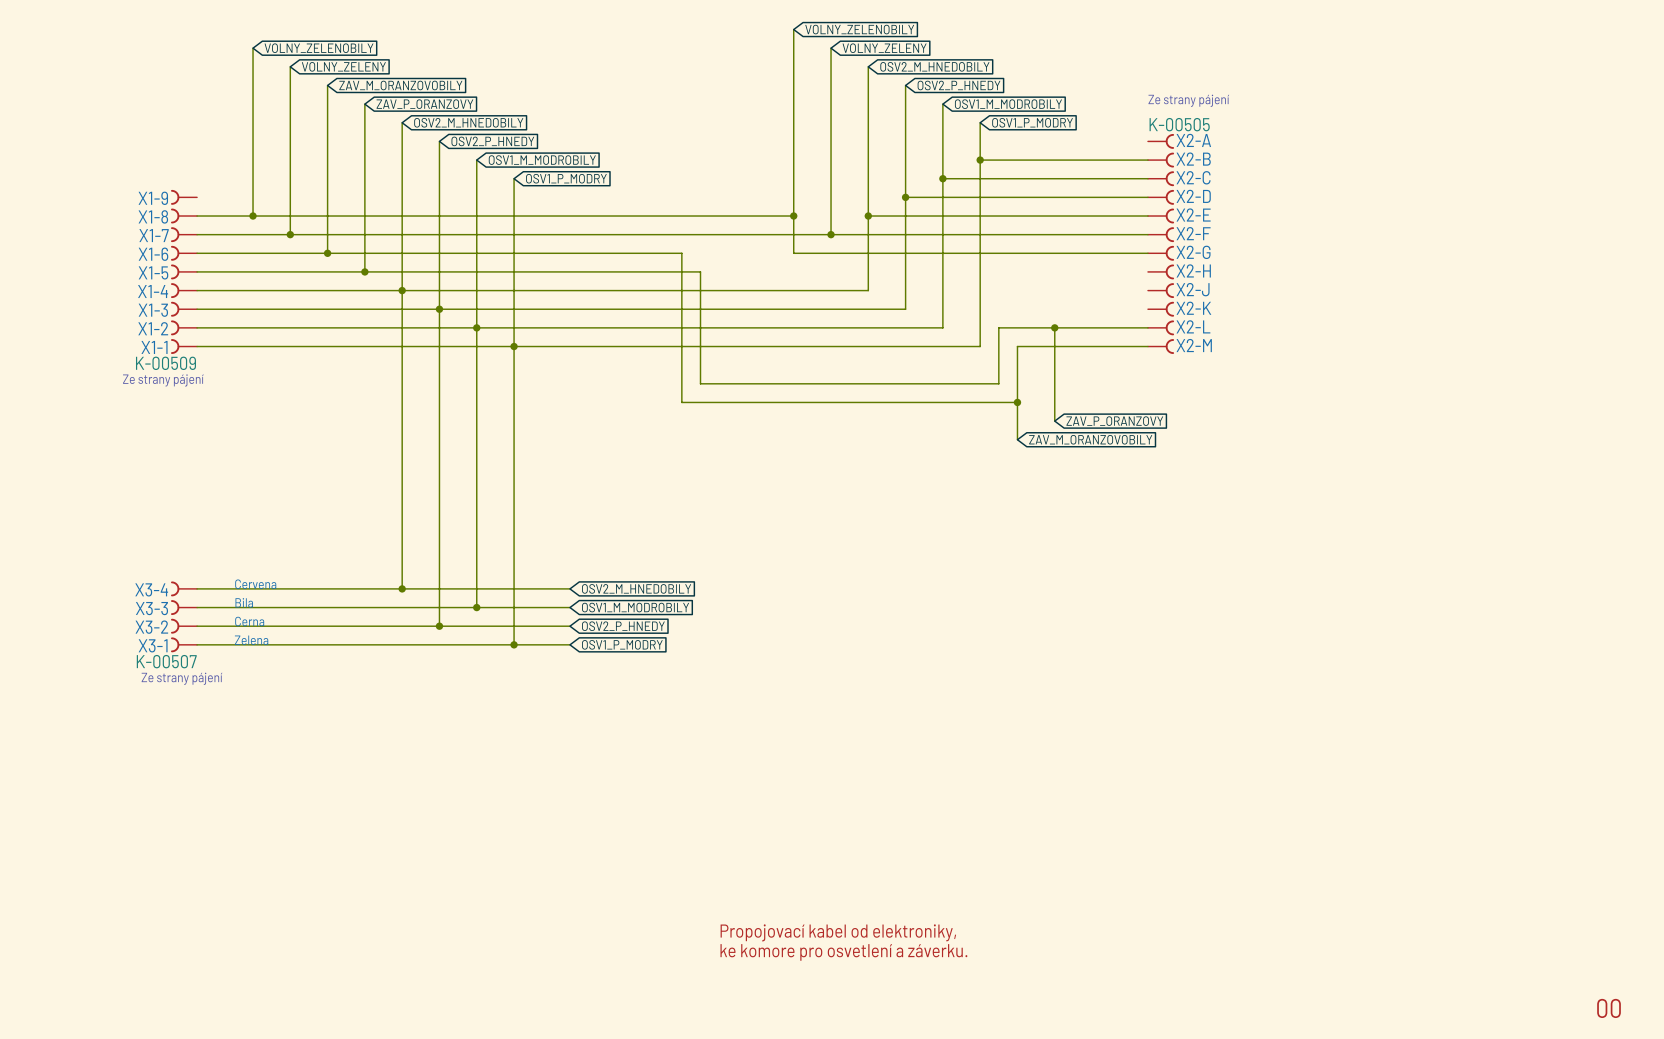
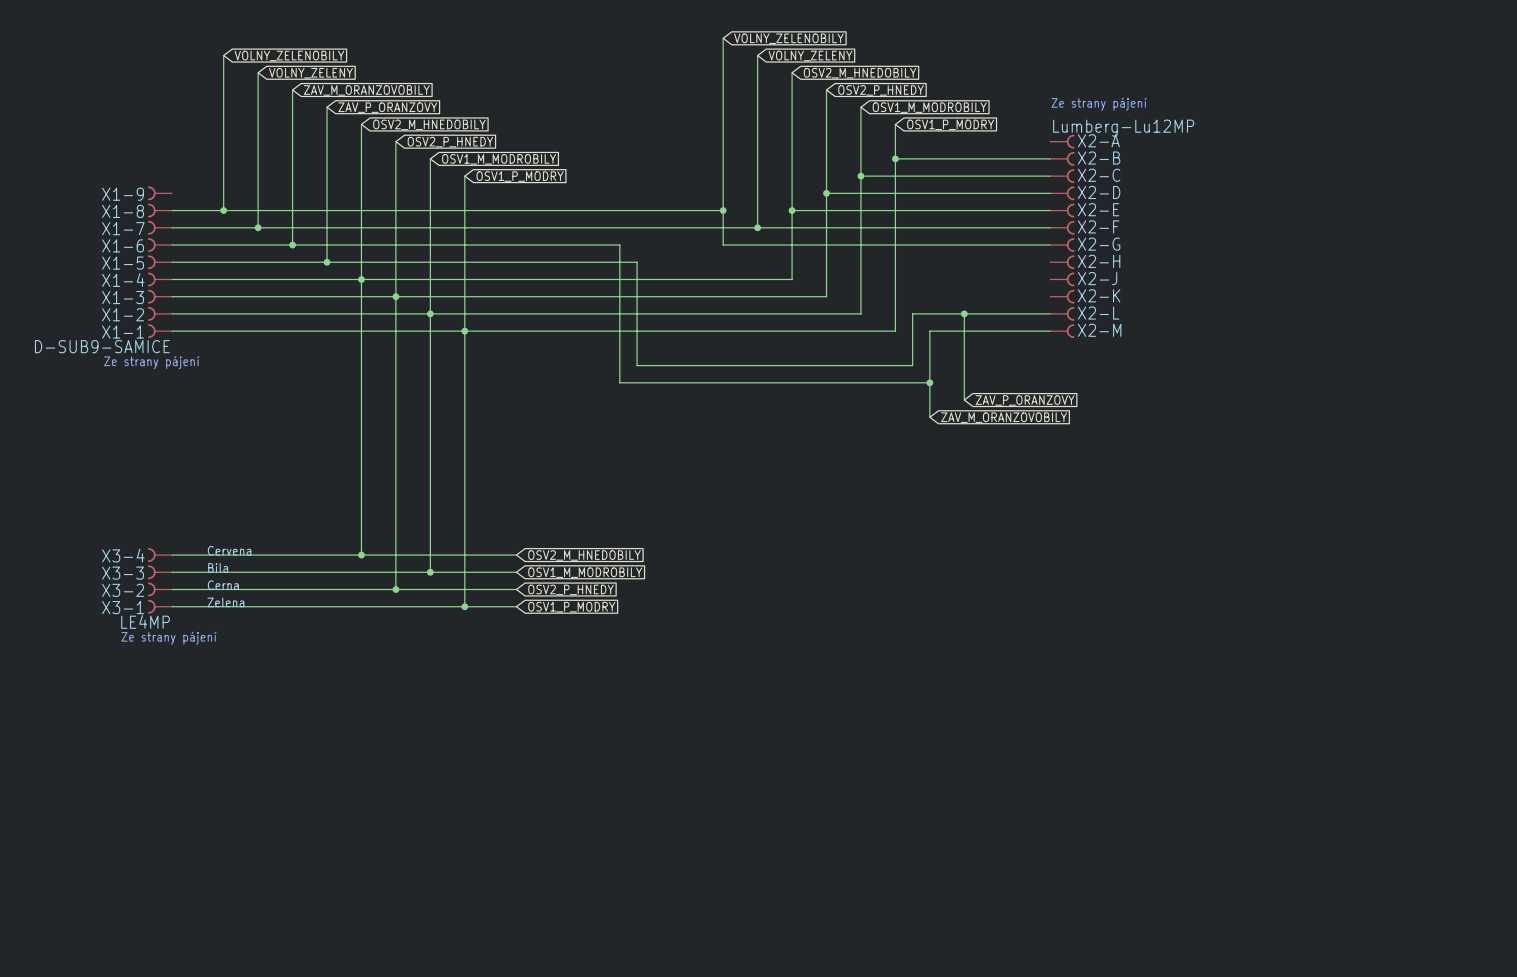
X2-A value: K-00505 (1179, 124) -> Lumberg-Lu12MP (1123, 128)
X1-1 value: K-00509 (165, 363) -> D-SUB9-SAMICE (102, 346)
X3-1 value: K-00507 (166, 661) -> LE4MP (145, 621)
text: Propojovací kabel od elektroniky, (838, 932) -> none
text: ke komore pro osvetlení a záverku. (843, 952) -> none
text: 00 (1609, 1008) -> none

